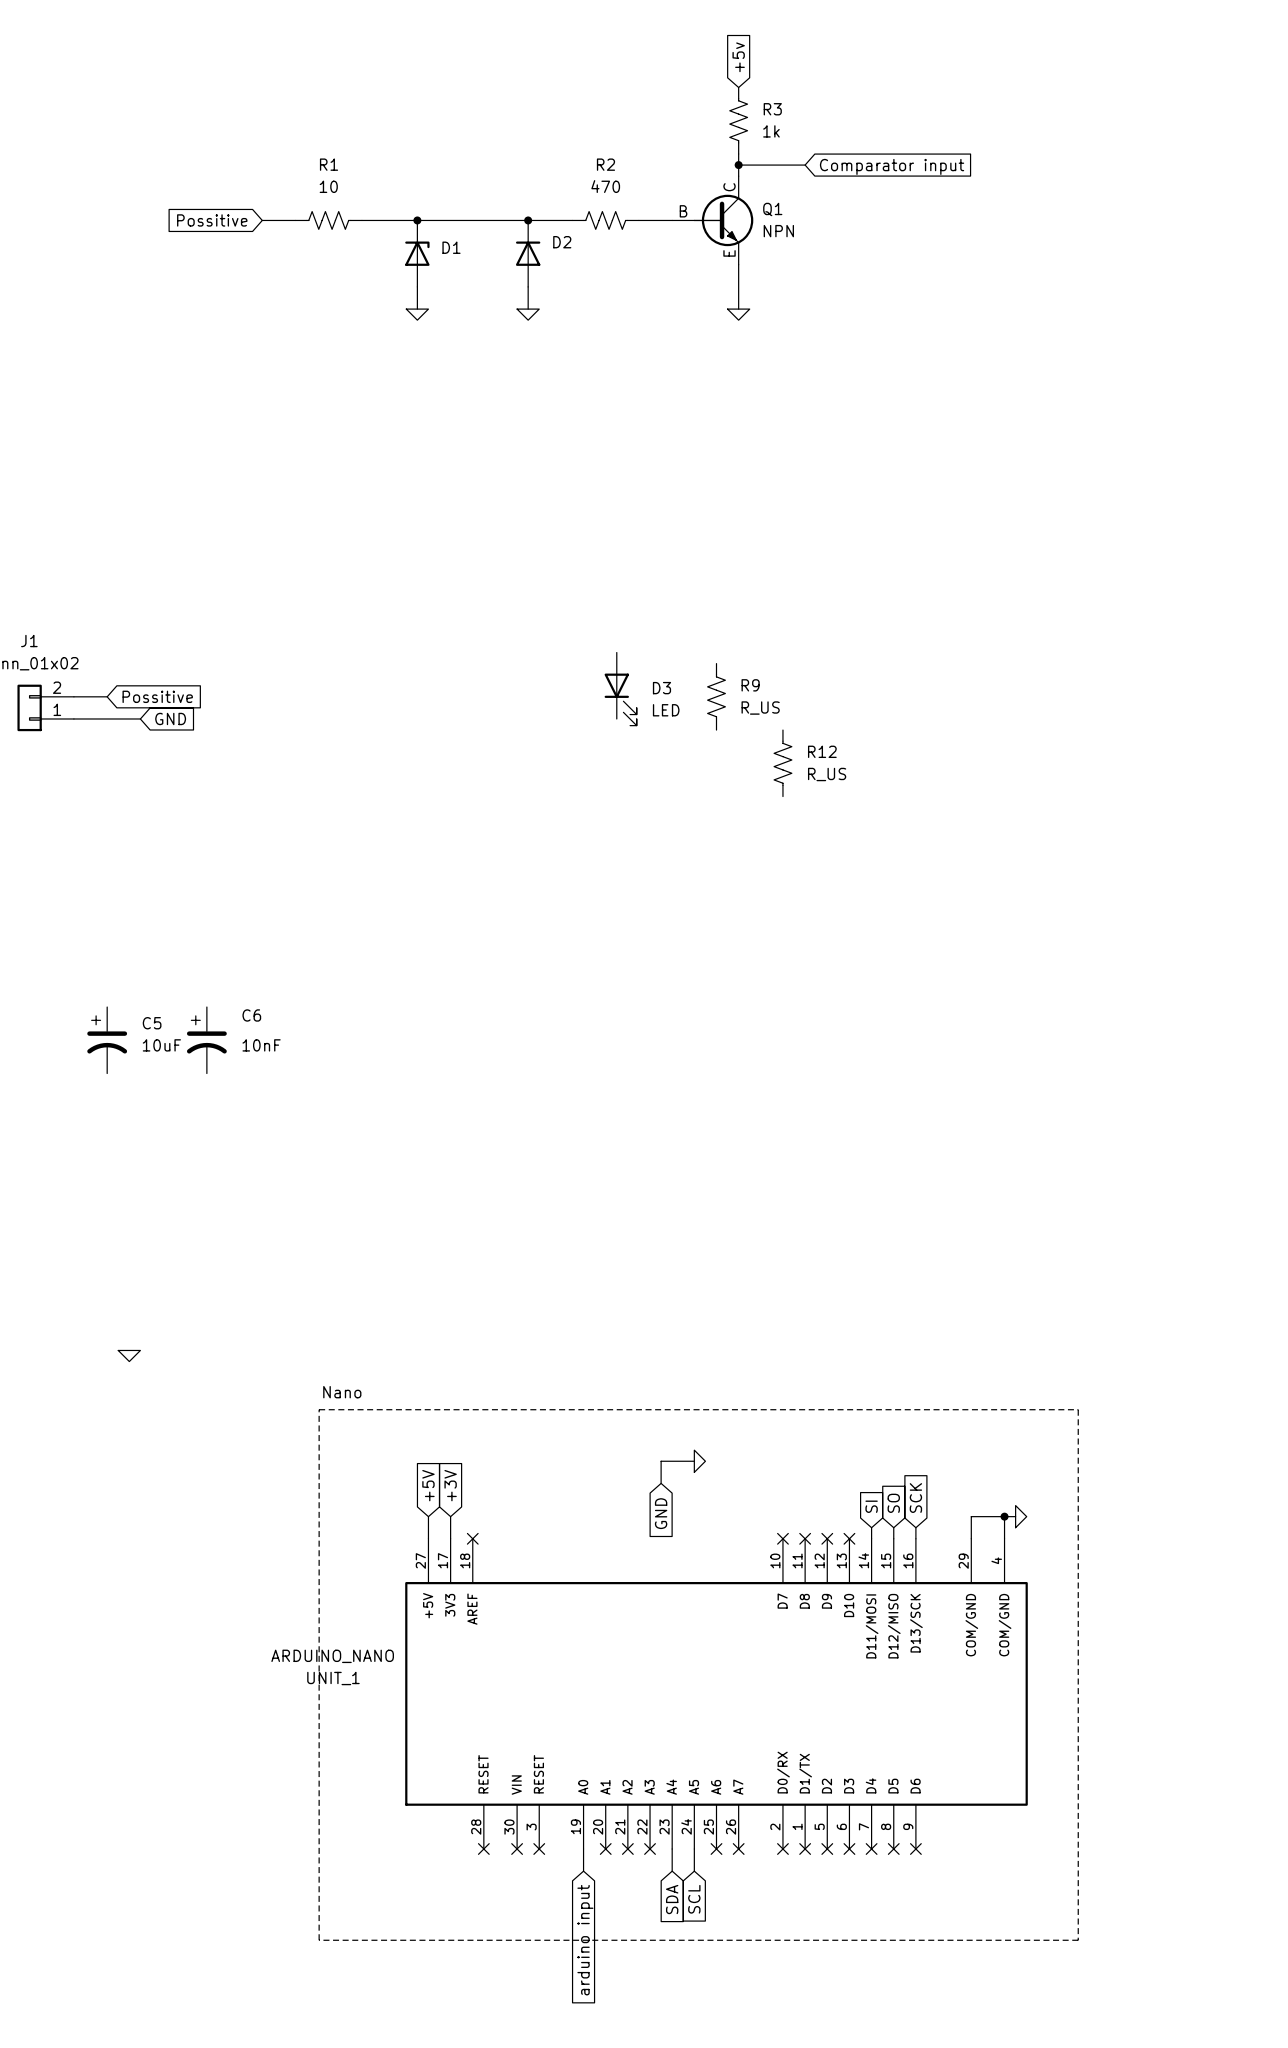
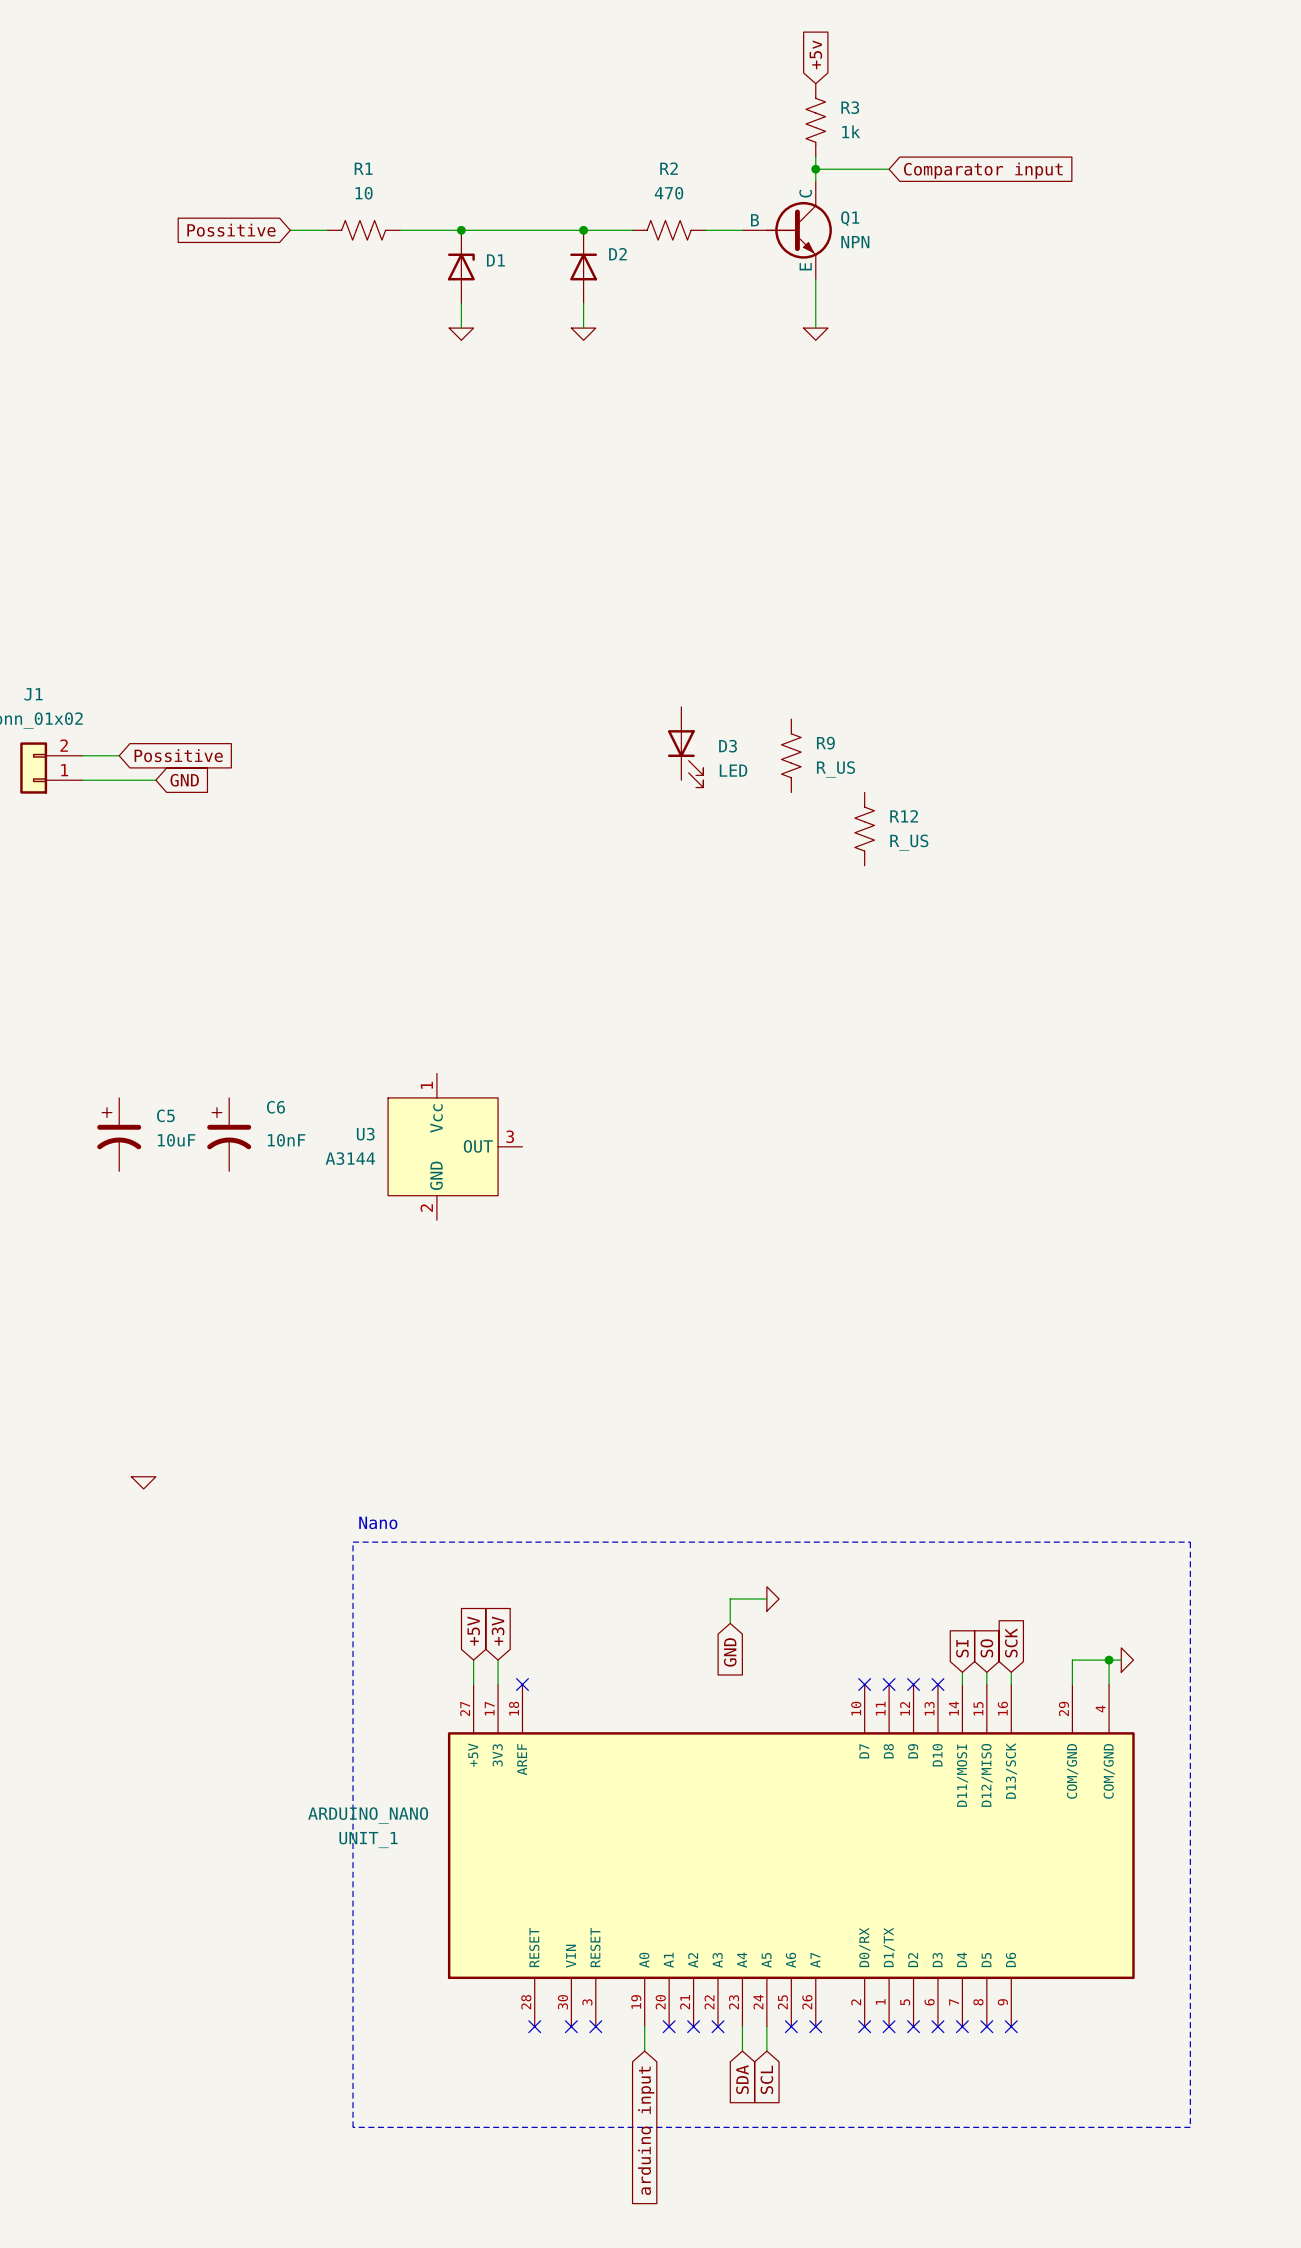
U3: none -> A3144 (455, 1146)

